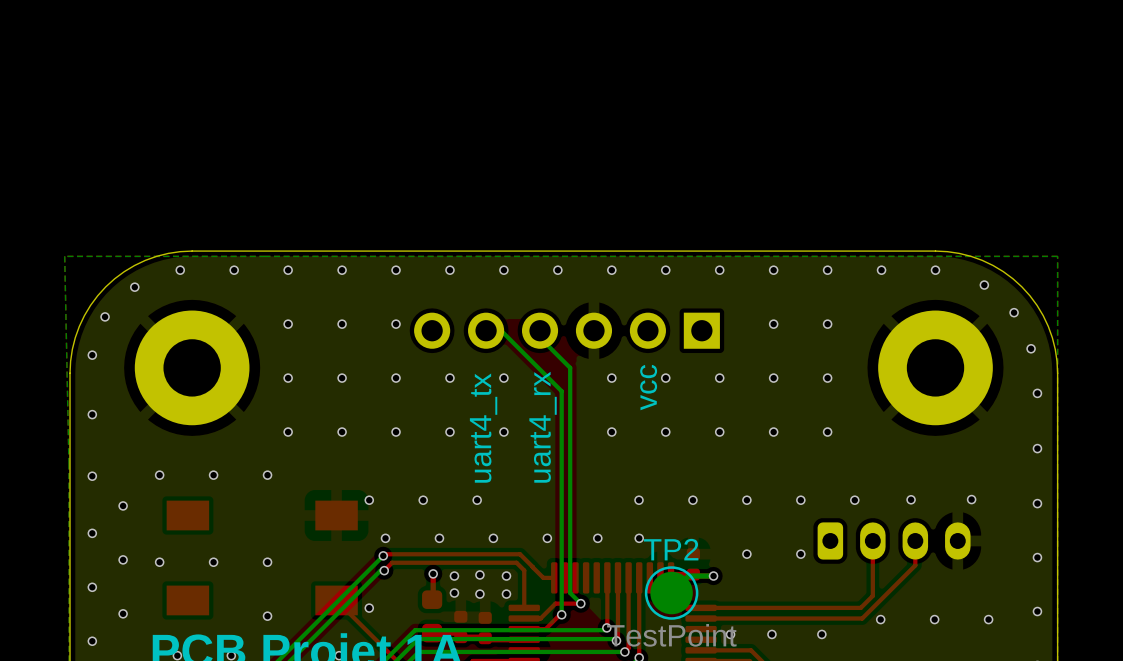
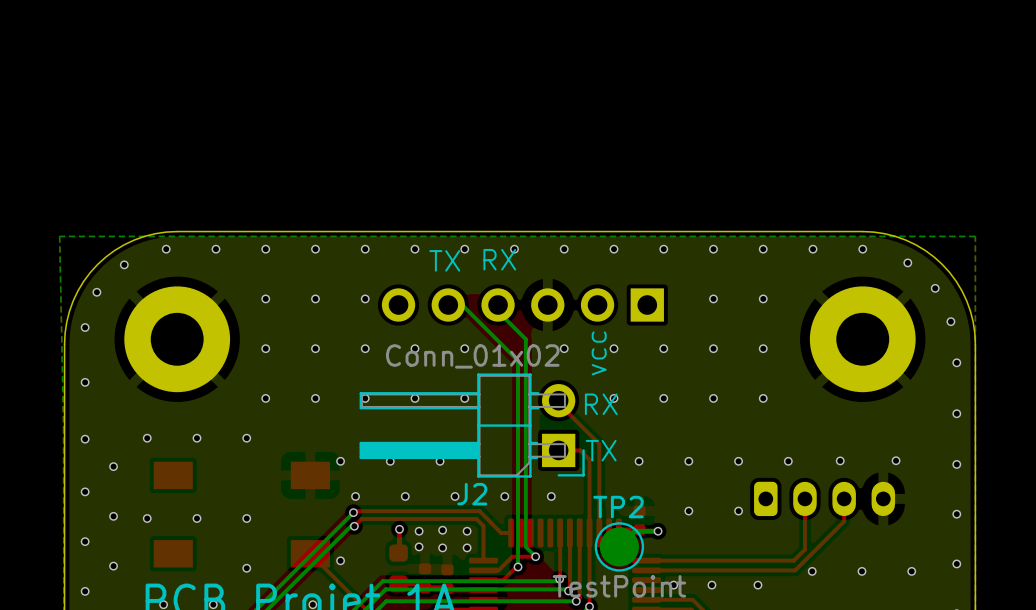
text: none -> RX (499, 259)
text: none -> TX (444, 260)
text: uart4_rx (543, 427) -> none
text: uart4_tx (483, 428) -> none
via: (611, 432) -> none
top track: none -> (555, 404) (559, 408) (563, 408) (599, 444) (599, 532)
text: none -> RX (601, 404)
J2: none -> Conn_01x02 (472, 425)
top track: none -> (558, 450) (580, 450) (589, 459) (589, 532)
text: none -> TX (601, 450)
via: (639, 500) -> none
via: (639, 538) -> none

